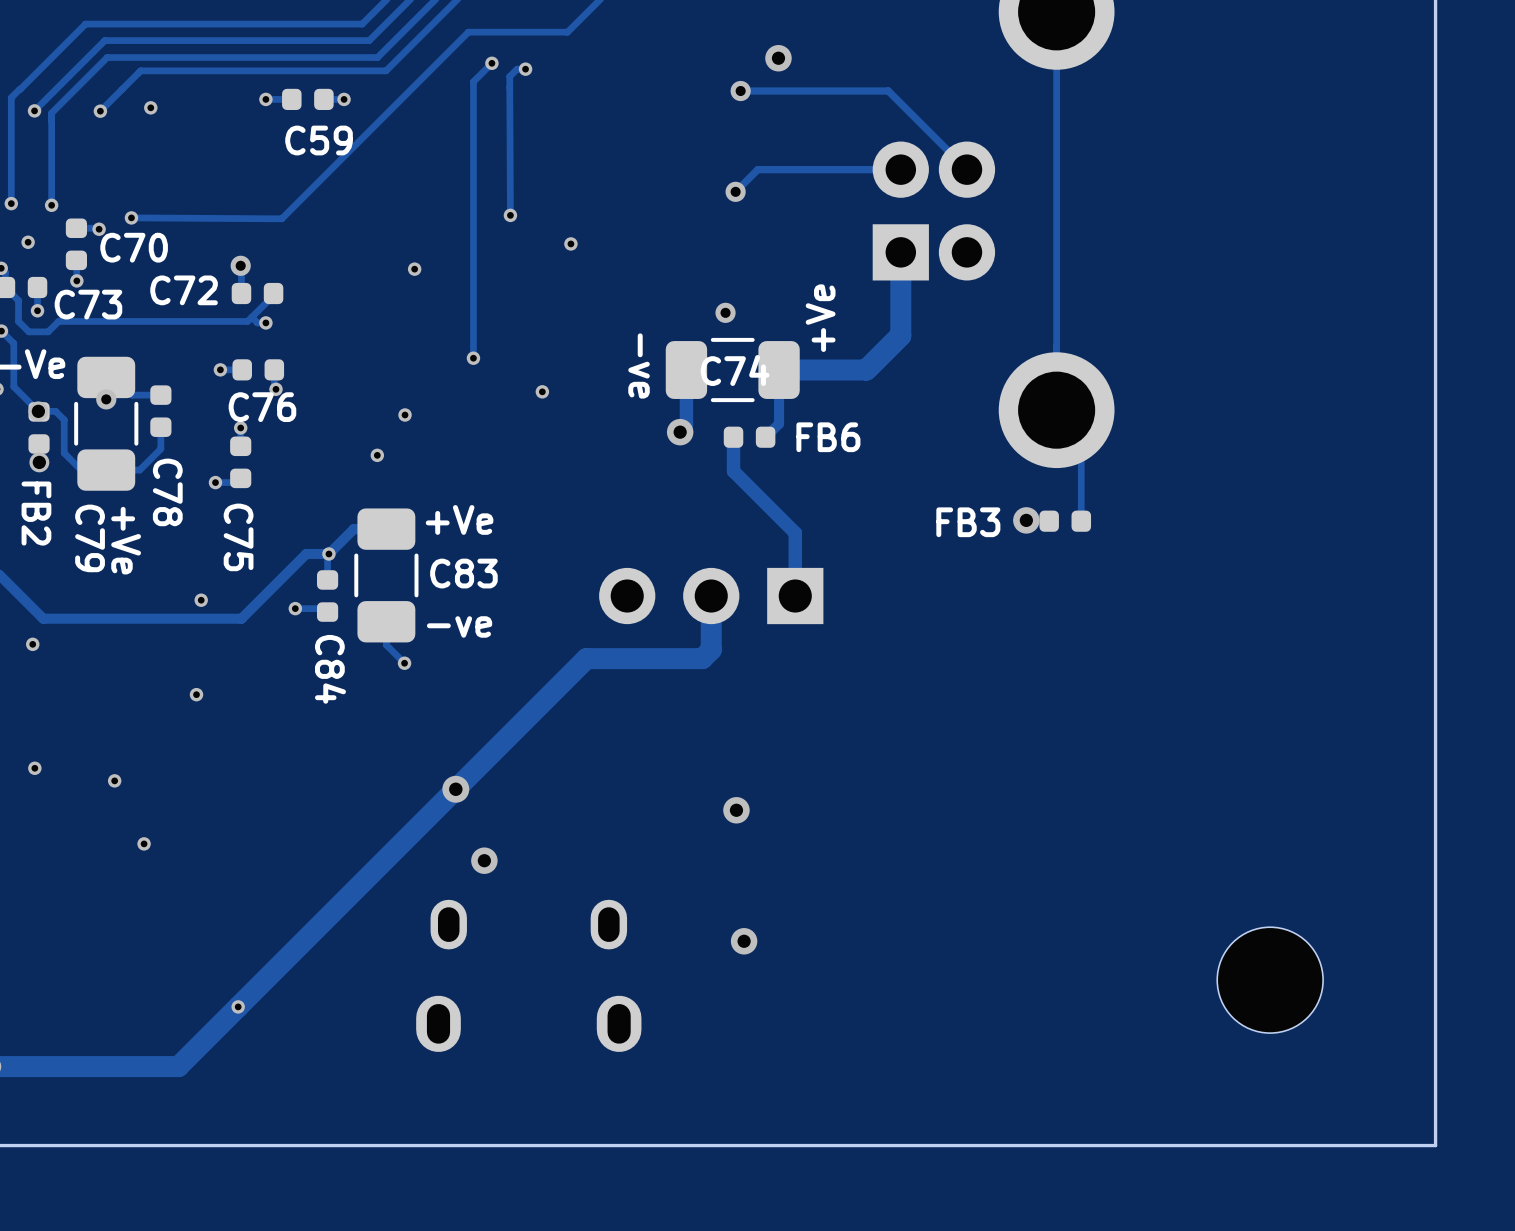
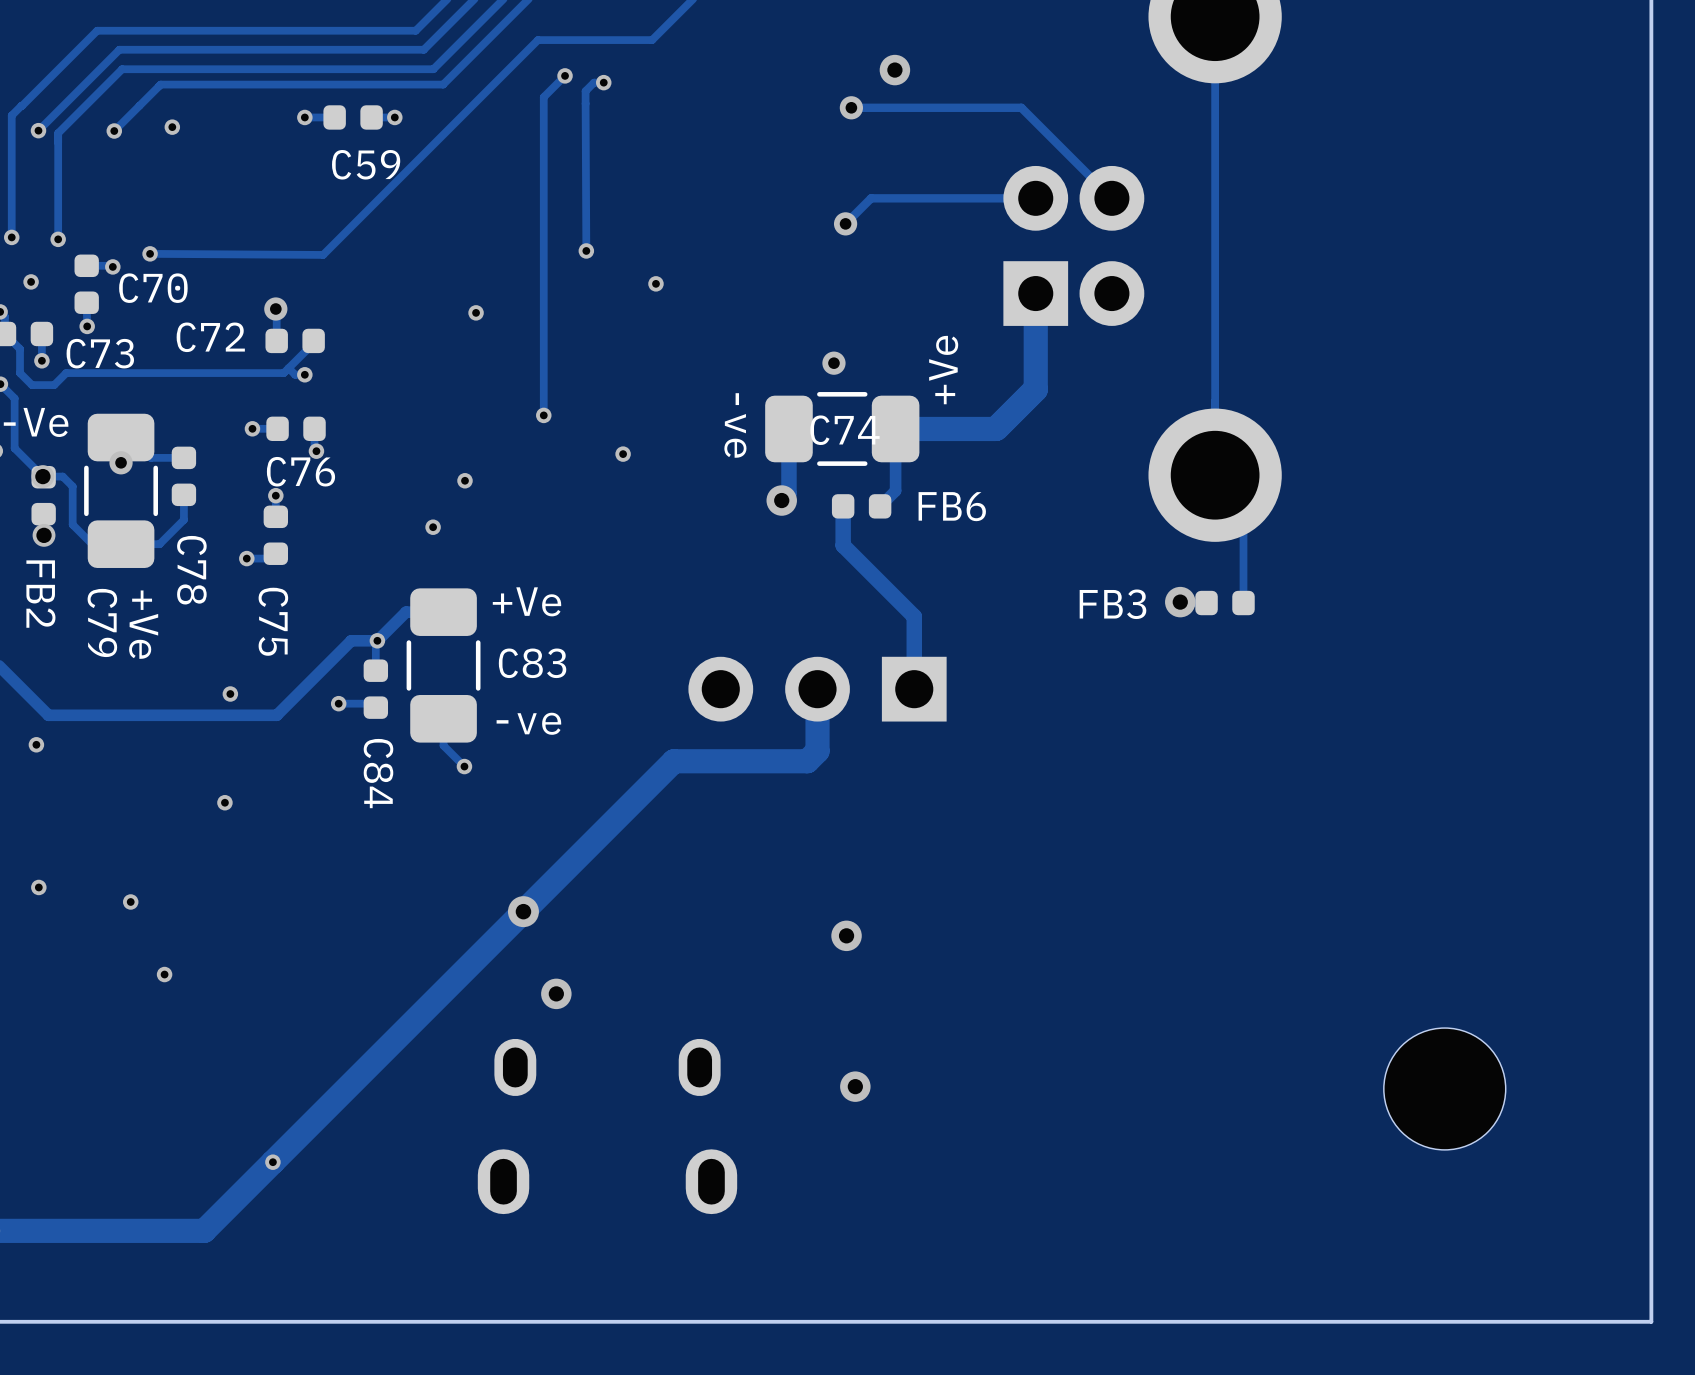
part position: (1270, 980) -> (1444, 1088)

